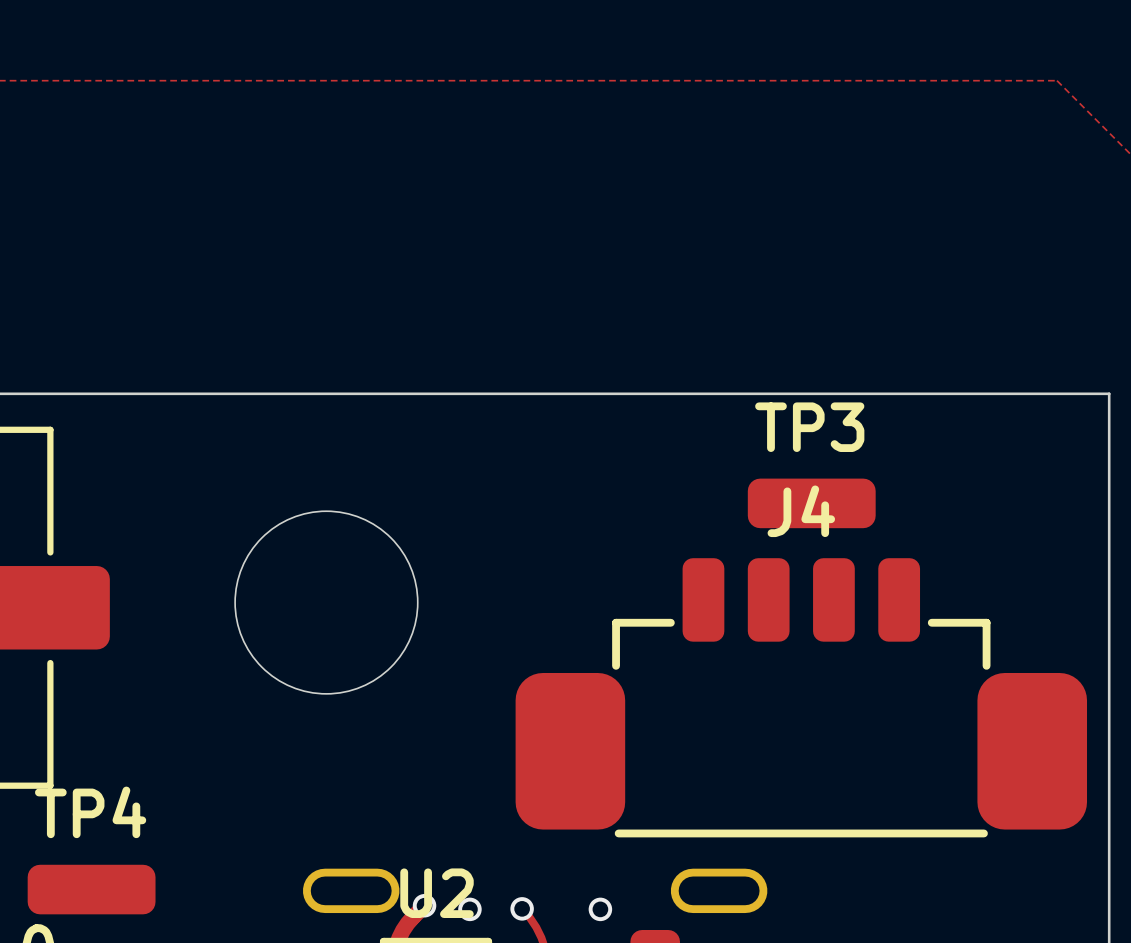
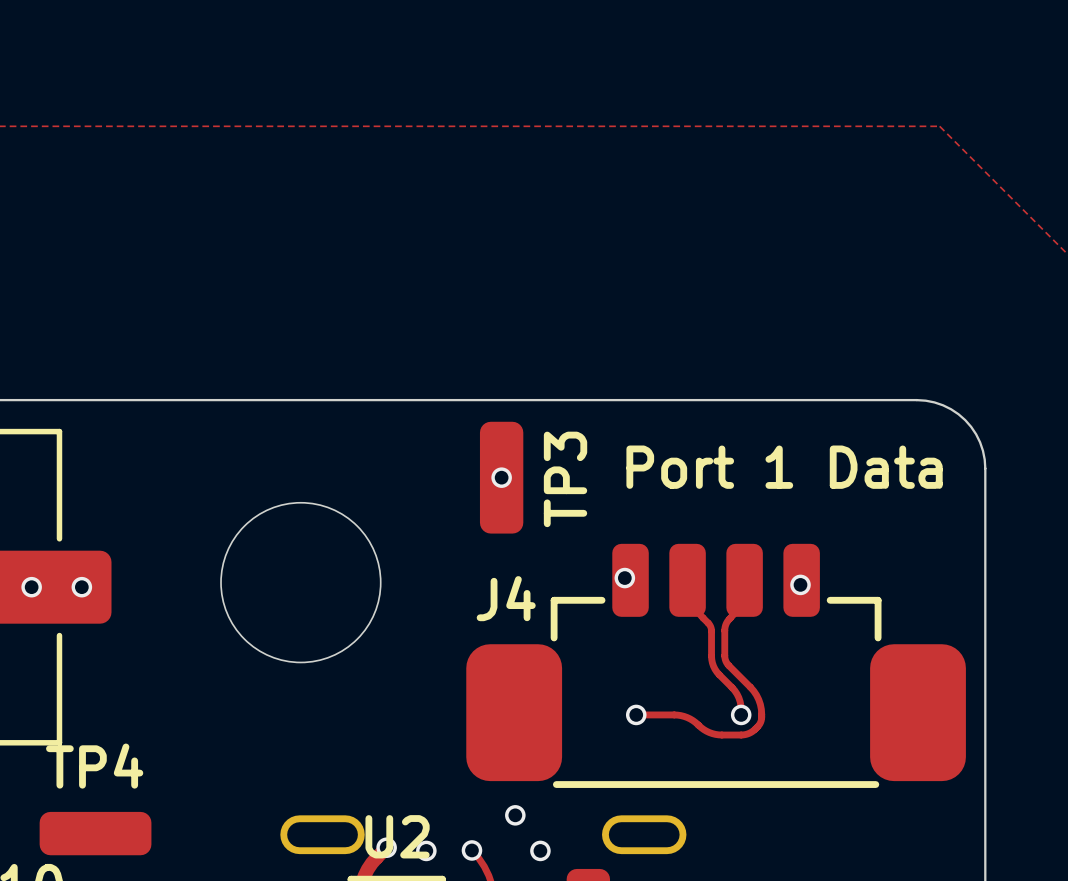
board edge: (1030, 393) (1109, 393) (1109, 472) -> (916, 400) (943, 405) (965, 420) (980, 442) (985, 468)
text: none -> Port 1 Data (784, 467)
via: none -> (501, 477)
TP3 rotation: 0° (811, 503) -> 90° clockwise (501, 477)
TP3 position: (811, 503) -> (501, 477)
J4 name position: J4 (801, 511) -> J4 (506, 598)
via: none -> (624, 578)
track: none -> (687, 580) (689, 595) (693, 605) (711, 628) (713, 666) (737, 694) (740, 701) (741, 714)
track: none -> (744, 580) (740, 602) (725, 625) (724, 657) (727, 664) (756, 695) (761, 709) (761, 718) (758, 725) (752, 731) (745, 734) (718, 734) (706, 731) (692, 720) (680, 715) (636, 714)
via: none -> (800, 584)
via: none -> (31, 587)
via: none -> (81, 587)
via: none -> (636, 714)
via: none -> (741, 714)
via: none -> (515, 815)

